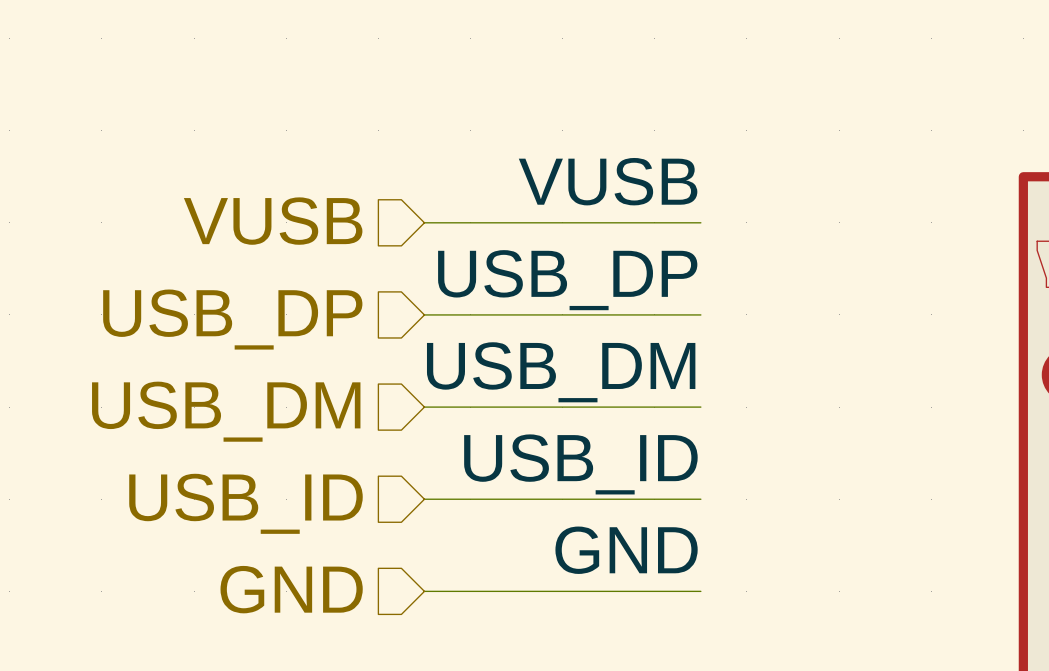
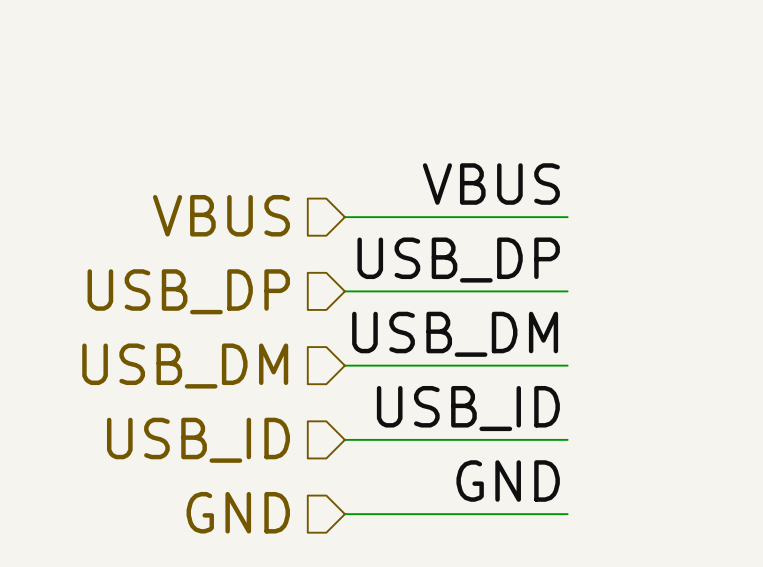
label: VUSB (608, 181) -> VBUS (491, 184)
hierarchical label: VUSB (273, 221) -> VBUS (221, 215)

